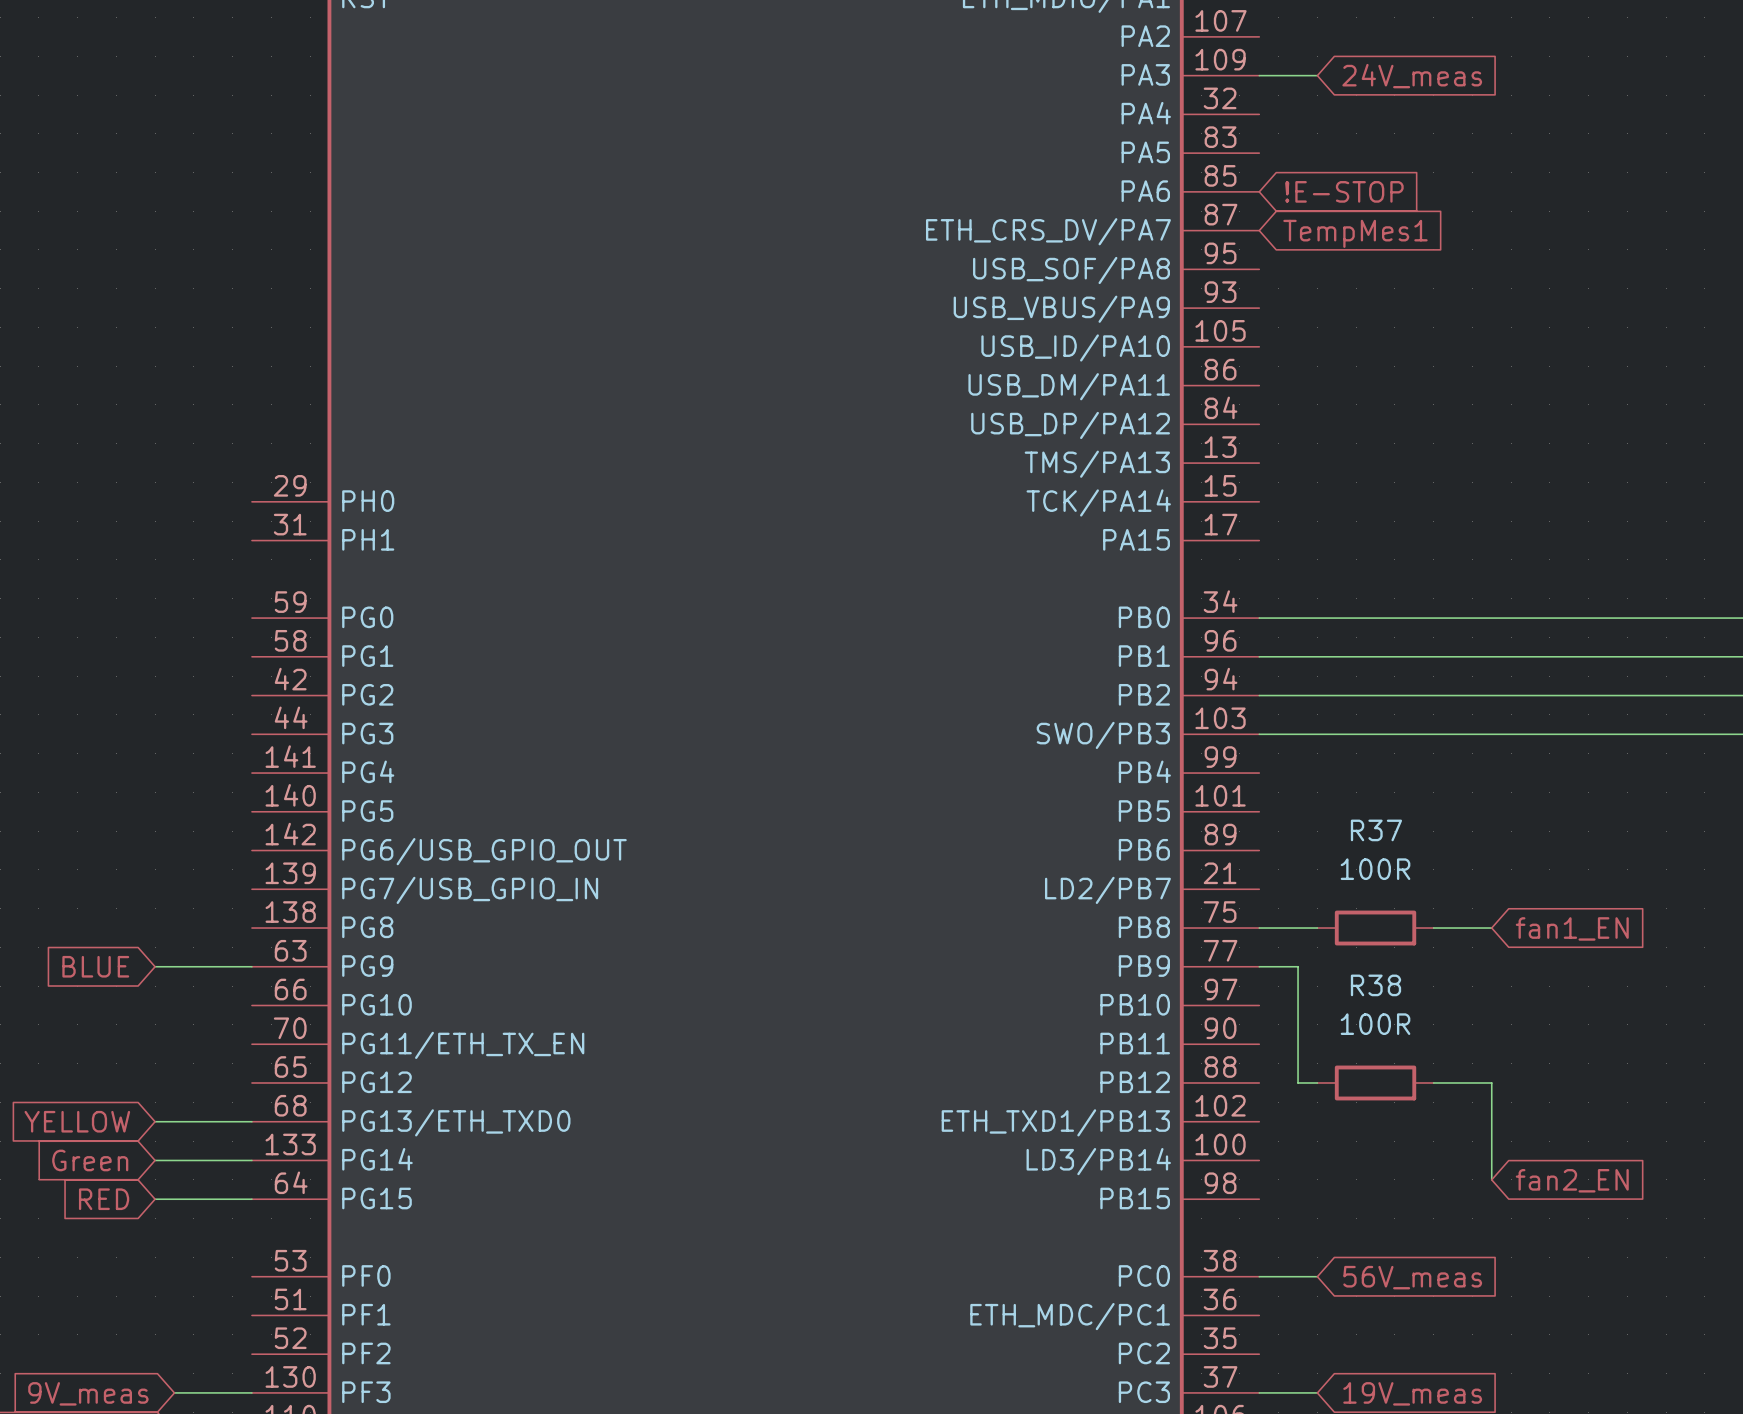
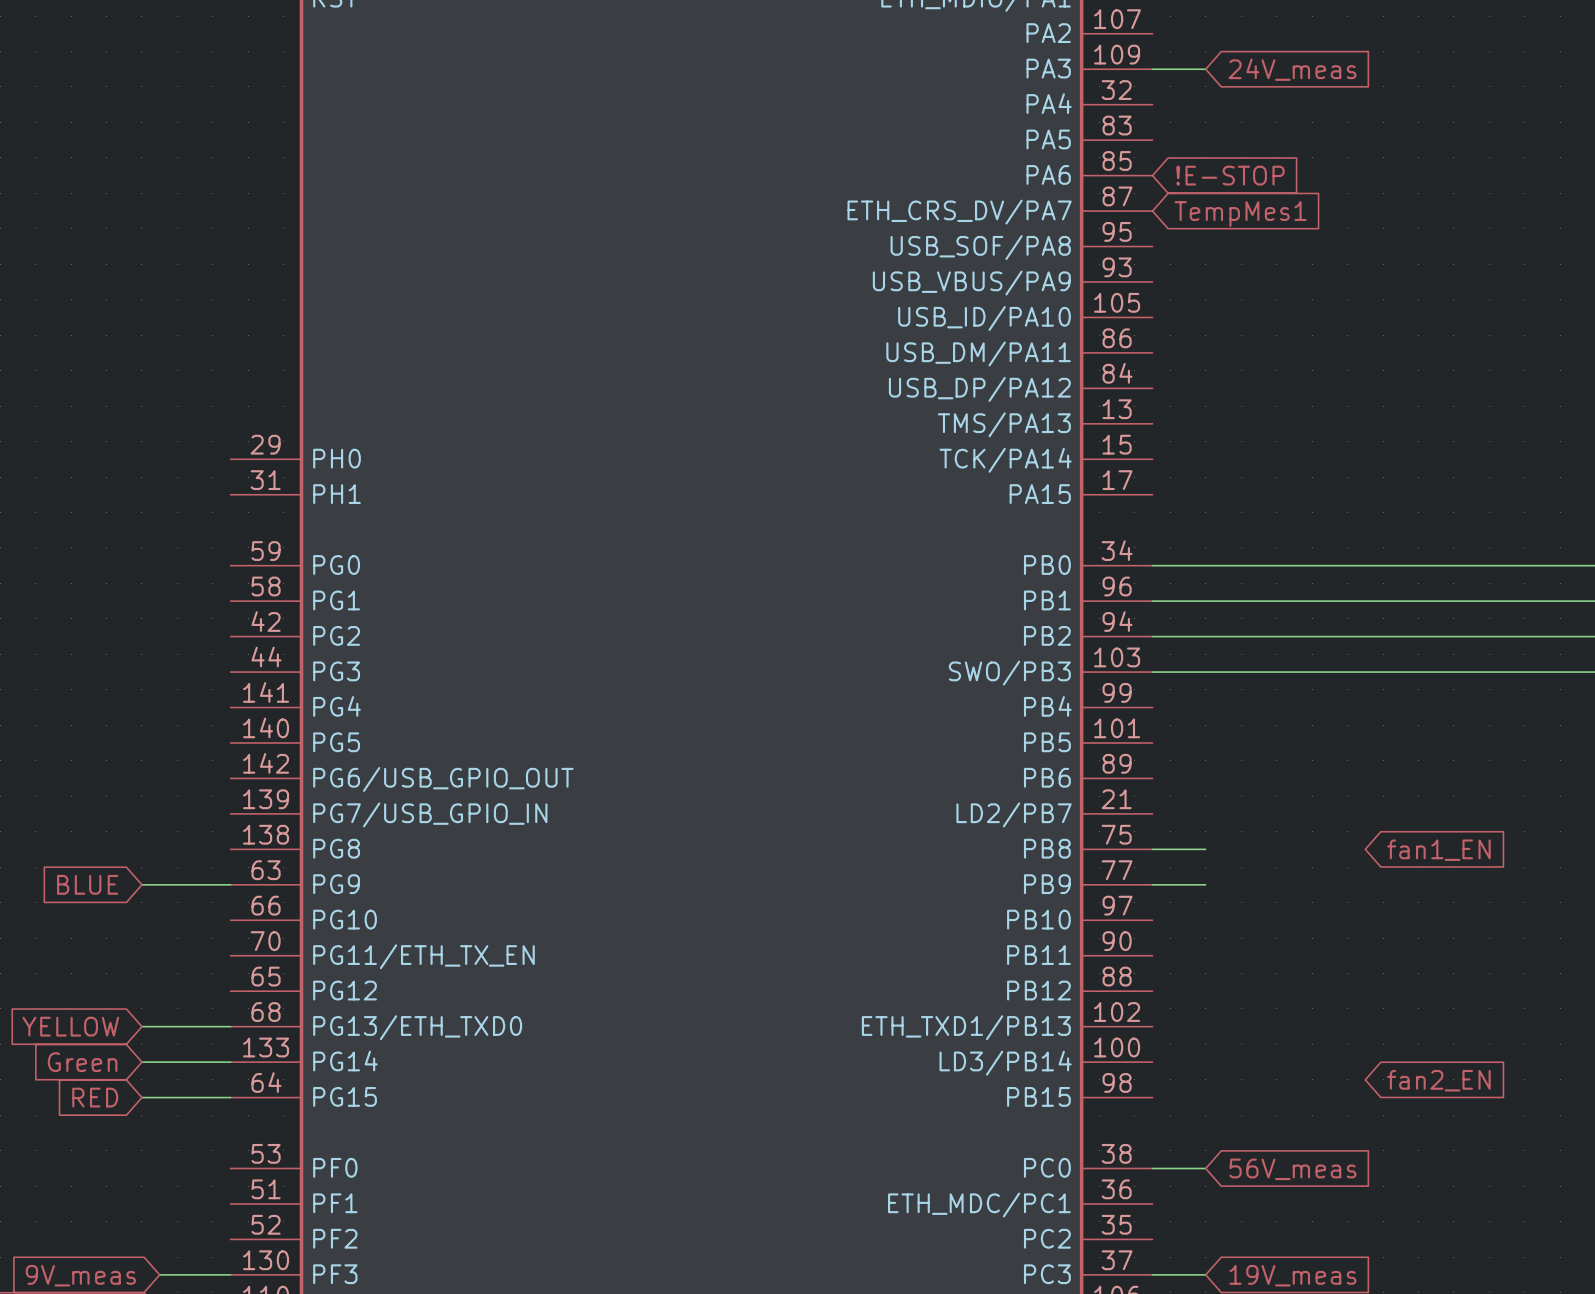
R37: 100R (1375, 928) -> none
wire: (1433, 928) (1491, 928) -> none
wire: (1298, 966) (1298, 1082) (1317, 1082) -> (1188, 884) (1205, 884)
R38: 100R (1375, 1082) -> none
wire: (1433, 1082) (1491, 1082) (1491, 1179) -> none

